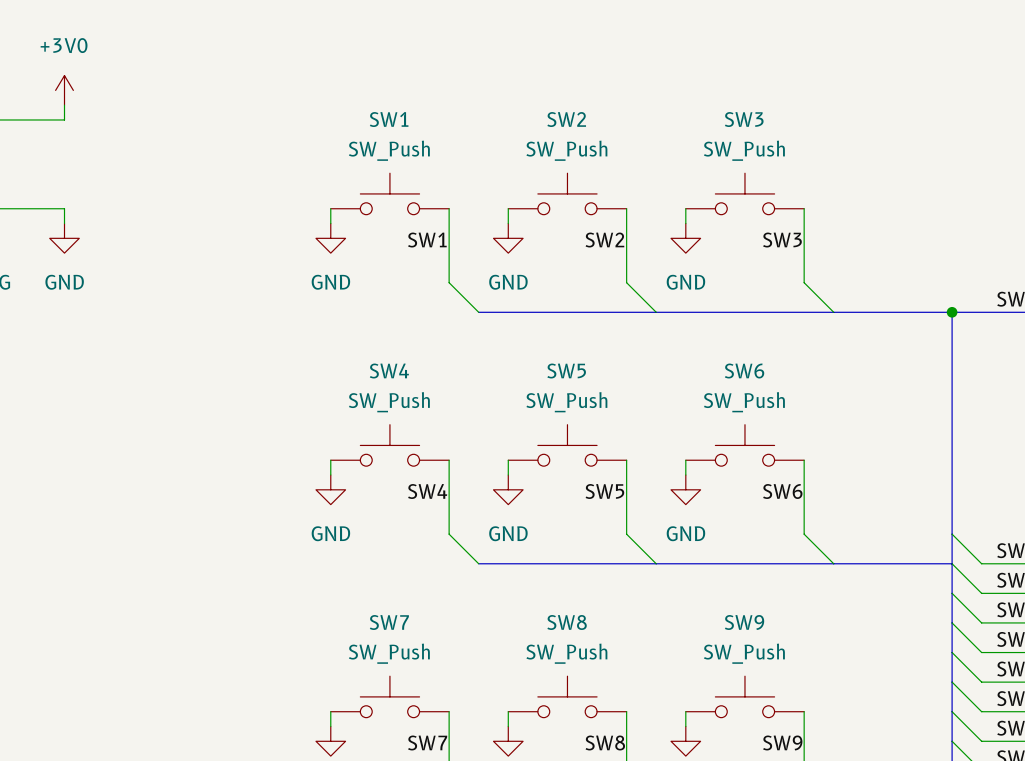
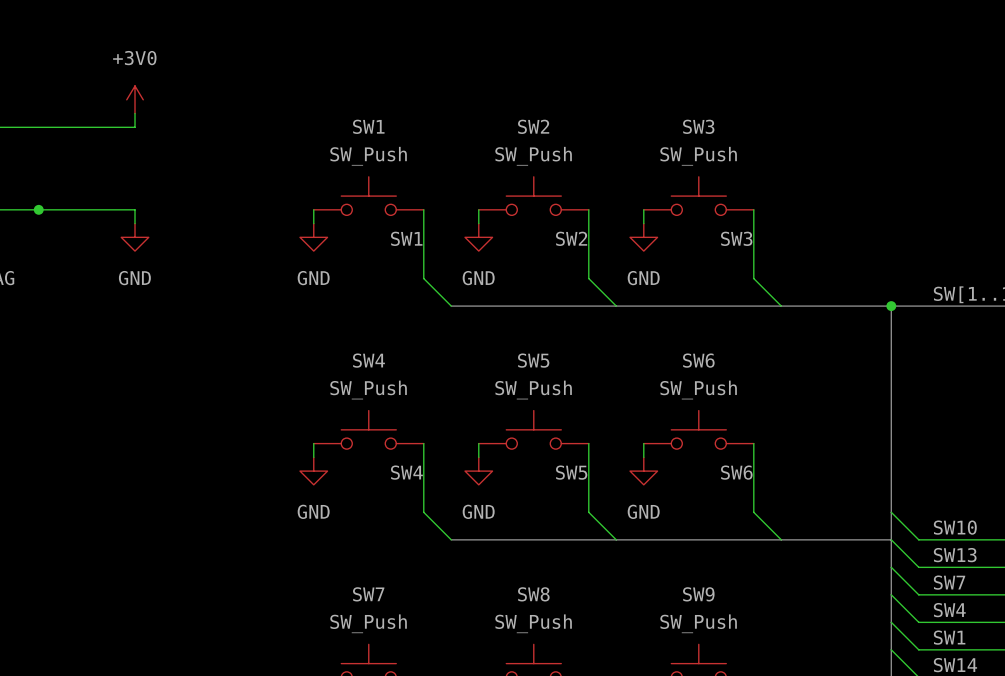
power symbol position: +3V0 (64, 90) -> +3V0 (135, 99)
wire: (64, 105) (64, 119) -> (135, 113) (135, 127) (66, 127)
junction: none -> (38, 209)
wire: (64, 208) (64, 223) -> (66, 209) (135, 209) (135, 223)
power symbol position: GND (64, 238) -> GND (135, 237)

